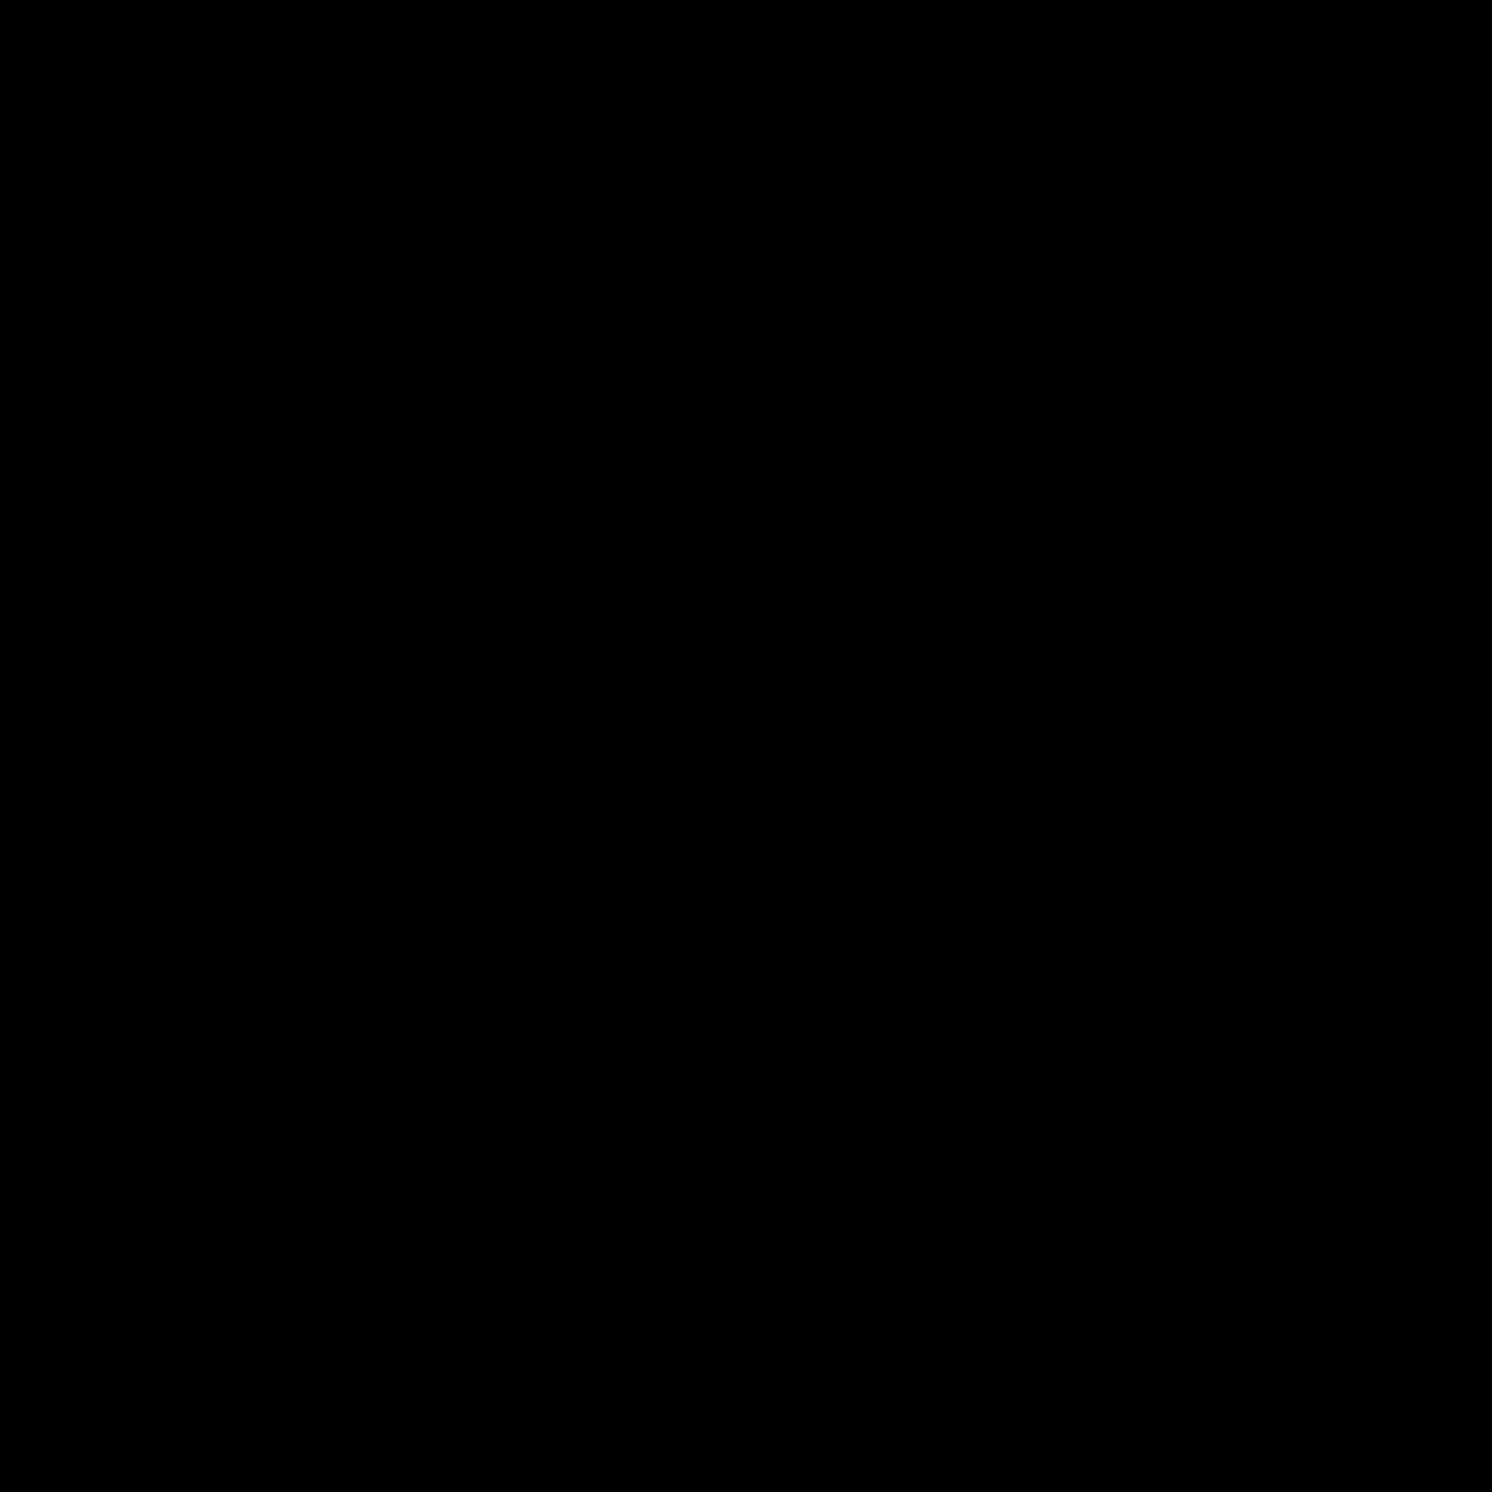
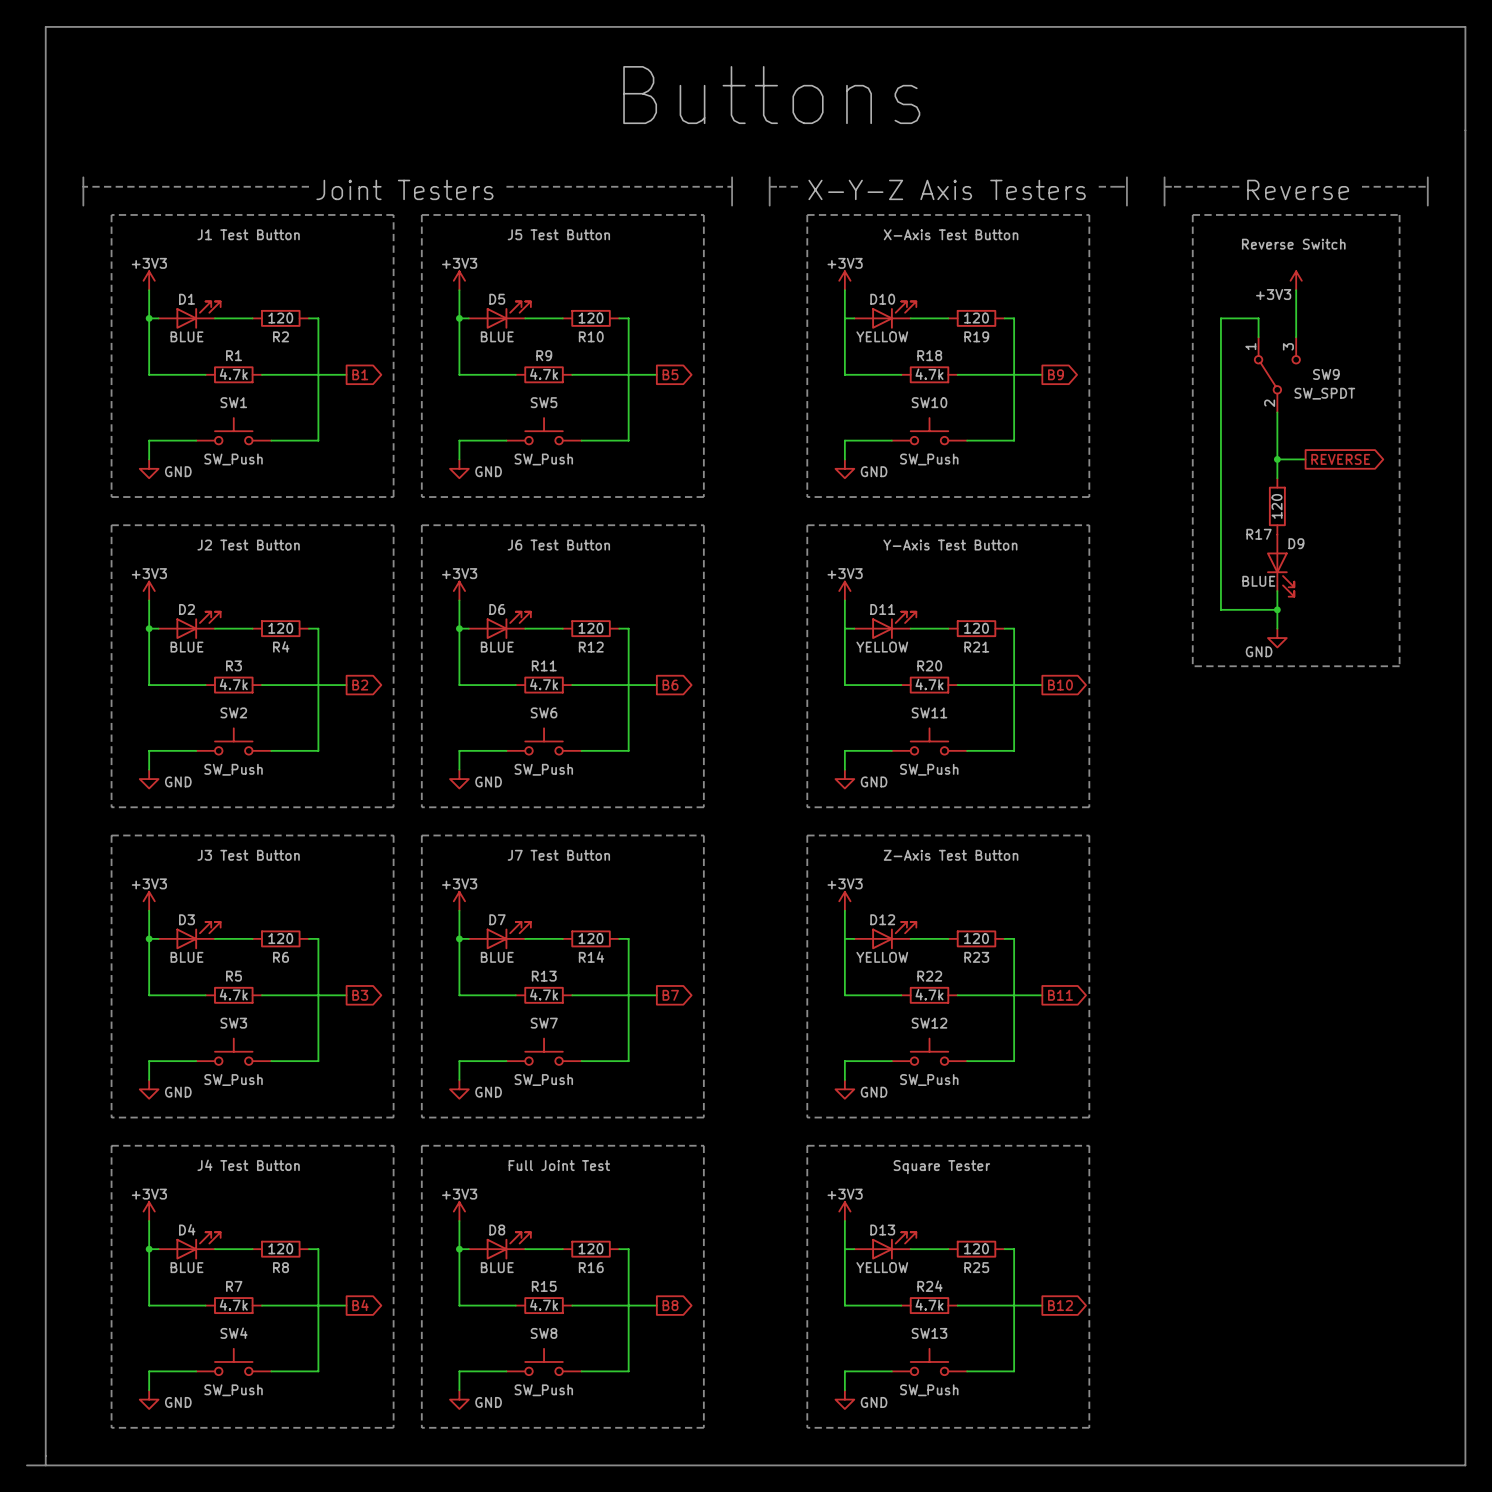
label: none -> Buttons (771, 95)
line: none -> (83, 177) (83, 205)
line: none -> (732, 177) (732, 205)
line: none -> (769, 177) (769, 205)
line: none -> (1126, 177) (1126, 205)
line: none -> (1164, 177) (1164, 205)
line: none -> (1427, 177) (1427, 205)
line: none -> (83, 186) (308, 186)
line: none -> (506, 186) (732, 186)
line: none -> (769, 186) (797, 186)
line: none -> (1098, 186) (1126, 186)
line: none -> (1164, 186) (1239, 186)
line: none -> (1361, 186) (1427, 186)
label: none -> Joint Testers (404, 189)
label: none -> X-Y-Z Axis Testers (947, 189)
label: none -> Reverse (1298, 189)
line: none -> (111, 214) (111, 497) (393, 497) (393, 214) (111, 214)
line: none -> (421, 214) (703, 214) (703, 497) (421, 497) (421, 214)
line: none -> (807, 214) (807, 497) (1089, 497) (1089, 214) (807, 214)
line: none -> (1192, 214) (1399, 214) (1399, 666) (1192, 666) (1192, 214)
label: none -> J1 Test Button (248, 234)
label: none -> J5 Test Button (558, 234)
label: none -> X-Axis Test Button (951, 234)
label: none -> Reverse Switch (1293, 244)
power symbol: none -> +3V3 (149, 280)
power symbol: none -> +3V3 (459, 280)
power symbol: none -> +3V3 (844, 280)
power symbol: none -> +3V3 (1296, 280)
wire: none -> (149, 290) (149, 374) (205, 374)
wire: none -> (459, 290) (459, 374) (515, 374)
wire: none -> (844, 290) (844, 374) (901, 374)
wire: none -> (1296, 290) (1296, 337)
D1: none -> BLUE (189, 315)
D5: none -> BLUE (499, 315)
D10: none -> YELLOW (885, 315)
wire: none -> (149, 318) (158, 318)
junction: none -> (149, 318)
wire: none -> (214, 318) (252, 318)
R2: none -> 120 (280, 318)
wire: none -> (308, 318) (318, 318) (318, 440) (271, 440)
wire: none -> (459, 318) (468, 318)
junction: none -> (459, 318)
wire: none -> (525, 318) (562, 318)
R10: none -> 120 (591, 318)
wire: none -> (619, 318) (628, 318) (628, 440) (581, 440)
wire: none -> (844, 318) (854, 318)
wire: none -> (910, 318) (948, 318)
R19: none -> 120 (976, 318)
wire: none -> (1004, 318) (1014, 318) (1014, 440) (967, 440)
wire: none -> (1258, 337) (1258, 318) (1220, 318) (1220, 609) (1277, 609)
R1: none -> 4.7k (233, 374)
wire: none -> (261, 374) (346, 374)
global label: none -> B1 (360, 374)
R9: none -> 4.7k (544, 374)
wire: none -> (572, 374) (656, 374)
global label: none -> B5 (670, 374)
R18: none -> 4.7k (929, 374)
wire: none -> (957, 374) (1042, 374)
global label: none -> B9 (1055, 374)
SW9: none -> SW_SPDT (1277, 374)
wire: none -> (1277, 412) (1277, 478)
SW1: none -> SW_Push (233, 431)
SW5: none -> SW_Push (544, 431)
SW10: none -> SW_Push (929, 431)
wire: none -> (196, 440) (149, 440) (149, 459)
wire: none -> (506, 440) (459, 440) (459, 459)
wire: none -> (891, 440) (844, 440) (844, 459)
wire: none -> (1277, 459) (1305, 459)
junction: none -> (1277, 459)
global label: none -> REVERSE (1340, 459)
power symbol: none -> GND (149, 468)
power symbol: none -> GND (459, 468)
power symbol: none -> GND (844, 468)
R17: none -> 120 (1277, 506)
line: none -> (111, 525) (111, 807) (393, 807) (393, 525) (111, 525)
line: none -> (421, 525) (703, 525) (703, 807) (421, 807) (421, 525)
line: none -> (807, 525) (807, 807) (1089, 807) (1089, 525) (807, 525)
label: none -> J2 Test Button (248, 545)
label: none -> J6 Test Button (558, 545)
label: none -> Y-Axis Test Button (950, 545)
D9: none -> BLUE (1280, 565)
power symbol: none -> +3V3 (149, 591)
power symbol: none -> +3V3 (459, 591)
power symbol: none -> +3V3 (844, 591)
wire: none -> (1277, 591) (1277, 628)
wire: none -> (149, 600) (149, 685) (205, 685)
wire: none -> (459, 600) (459, 685) (515, 685)
wire: none -> (844, 600) (844, 685) (901, 685)
junction: none -> (1277, 609)
D2: none -> BLUE (189, 625)
D6: none -> BLUE (499, 625)
D11: none -> YELLOW (885, 625)
wire: none -> (149, 628) (158, 628)
junction: none -> (149, 628)
wire: none -> (214, 628) (252, 628)
R4: none -> 120 (280, 628)
wire: none -> (308, 628) (318, 628) (318, 750) (271, 750)
wire: none -> (459, 628) (468, 628)
junction: none -> (459, 628)
wire: none -> (525, 628) (562, 628)
R12: none -> 120 (591, 628)
wire: none -> (619, 628) (628, 628) (628, 750) (581, 750)
wire: none -> (844, 628) (854, 628)
wire: none -> (910, 628) (948, 628)
R21: none -> 120 (976, 628)
wire: none -> (1004, 628) (1014, 628) (1014, 750) (967, 750)
power symbol: none -> GND (1277, 638)
R3: none -> 4.7k (233, 685)
wire: none -> (261, 685) (346, 685)
global label: none -> B2 (360, 685)
R11: none -> 4.7k (544, 685)
wire: none -> (572, 685) (656, 685)
global label: none -> B6 (670, 685)
R20: none -> 4.7k (929, 685)
wire: none -> (957, 685) (1042, 685)
global label: none -> B10 (1060, 685)
SW2: none -> SW_Push (233, 741)
SW6: none -> SW_Push (544, 741)
SW11: none -> SW_Push (929, 741)
wire: none -> (196, 750) (149, 750) (149, 769)
wire: none -> (506, 750) (459, 750) (459, 769)
wire: none -> (891, 750) (844, 750) (844, 769)
power symbol: none -> GND (149, 779)
power symbol: none -> GND (459, 779)
power symbol: none -> GND (844, 779)
line: none -> (111, 835) (111, 1117) (393, 1117) (393, 835) (111, 835)
line: none -> (421, 835) (703, 835) (703, 1117) (421, 1117) (421, 835)
line: none -> (807, 835) (807, 1117) (1089, 1117) (1089, 835) (807, 835)
label: none -> J3 Test Button (248, 855)
label: none -> J7 Test Button (558, 855)
label: none -> Z-Axis Test Button (951, 855)
power symbol: none -> +3V3 (149, 901)
power symbol: none -> +3V3 (459, 901)
power symbol: none -> +3V3 (844, 901)
wire: none -> (149, 910) (149, 995) (205, 995)
wire: none -> (459, 910) (459, 995) (515, 995)
wire: none -> (844, 910) (844, 995) (901, 995)
D3: none -> BLUE (189, 935)
D7: none -> BLUE (499, 935)
D12: none -> YELLOW (885, 935)
wire: none -> (149, 938) (158, 938)
junction: none -> (149, 938)
wire: none -> (214, 938) (252, 938)
R6: none -> 120 (280, 938)
wire: none -> (308, 938) (318, 938) (318, 1061) (271, 1061)
wire: none -> (459, 938) (468, 938)
junction: none -> (459, 938)
wire: none -> (525, 938) (562, 938)
R14: none -> 120 (591, 938)
wire: none -> (619, 938) (628, 938) (628, 1061) (581, 1061)
wire: none -> (844, 938) (854, 938)
wire: none -> (910, 938) (948, 938)
R23: none -> 120 (976, 938)
wire: none -> (1004, 938) (1014, 938) (1014, 1061) (967, 1061)
R5: none -> 4.7k (233, 995)
wire: none -> (261, 995) (346, 995)
global label: none -> B3 (360, 995)
R13: none -> 4.7k (544, 995)
wire: none -> (572, 995) (656, 995)
global label: none -> B7 (670, 995)
R22: none -> 4.7k (929, 995)
wire: none -> (957, 995) (1042, 995)
global label: none -> B11 (1060, 995)
SW3: none -> SW_Push (233, 1051)
SW7: none -> SW_Push (544, 1051)
SW12: none -> SW_Push (929, 1051)
wire: none -> (196, 1061) (149, 1061) (149, 1079)
wire: none -> (506, 1061) (459, 1061) (459, 1079)
wire: none -> (891, 1061) (844, 1061) (844, 1079)
power symbol: none -> GND (149, 1089)
power symbol: none -> GND (459, 1089)
power symbol: none -> GND (844, 1089)
line: none -> (111, 1145) (393, 1145) (393, 1427) (111, 1427) (111, 1145)
line: none -> (421, 1145) (703, 1145) (703, 1427) (421, 1427) (421, 1145)
line: none -> (807, 1145) (1089, 1145) (1089, 1427) (807, 1427) (807, 1145)
label: none -> J4 Test Button (248, 1165)
label: none -> Full Joint Test (559, 1165)
label: none -> Square Tester (941, 1167)
power symbol: none -> +3V3 (149, 1211)
power symbol: none -> +3V3 (459, 1211)
power symbol: none -> +3V3 (844, 1211)
wire: none -> (149, 1220) (149, 1305) (205, 1305)
wire: none -> (459, 1220) (459, 1305) (515, 1305)
wire: none -> (844, 1220) (844, 1305) (901, 1305)
D4: none -> BLUE (189, 1245)
D8: none -> BLUE (499, 1245)
D13: none -> YELLOW (885, 1245)
wire: none -> (149, 1249) (158, 1249)
junction: none -> (149, 1249)
wire: none -> (214, 1249) (252, 1249)
R8: none -> 120 (280, 1249)
wire: none -> (308, 1249) (318, 1249) (318, 1371) (271, 1371)
wire: none -> (459, 1249) (468, 1249)
junction: none -> (459, 1249)
wire: none -> (525, 1249) (562, 1249)
R16: none -> 120 (591, 1249)
wire: none -> (619, 1249) (628, 1249) (628, 1371) (581, 1371)
wire: none -> (844, 1249) (854, 1249)
wire: none -> (910, 1249) (948, 1249)
R25: none -> 120 (976, 1249)
wire: none -> (1004, 1249) (1014, 1249) (1014, 1371) (967, 1371)
R7: none -> 4.7k (233, 1305)
wire: none -> (261, 1305) (346, 1305)
global label: none -> B4 (360, 1305)
R15: none -> 4.7k (544, 1305)
wire: none -> (572, 1305) (656, 1305)
global label: none -> B8 (670, 1305)
R24: none -> 4.7k (929, 1305)
wire: none -> (957, 1305) (1042, 1305)
global label: none -> B12 (1060, 1305)
SW4: none -> SW_Push (233, 1361)
SW8: none -> SW_Push (544, 1361)
SW13: none -> SW_Push (929, 1361)
wire: none -> (196, 1371) (149, 1371) (149, 1390)
wire: none -> (506, 1371) (459, 1371) (459, 1390)
wire: none -> (891, 1371) (844, 1371) (844, 1390)
power symbol: none -> GND (149, 1399)
power symbol: none -> GND (459, 1399)
power symbol: none -> GND (844, 1399)
line: none -> (26, 1465) (1465, 1465) (1465, 26) (45, 26) (45, 1465)

